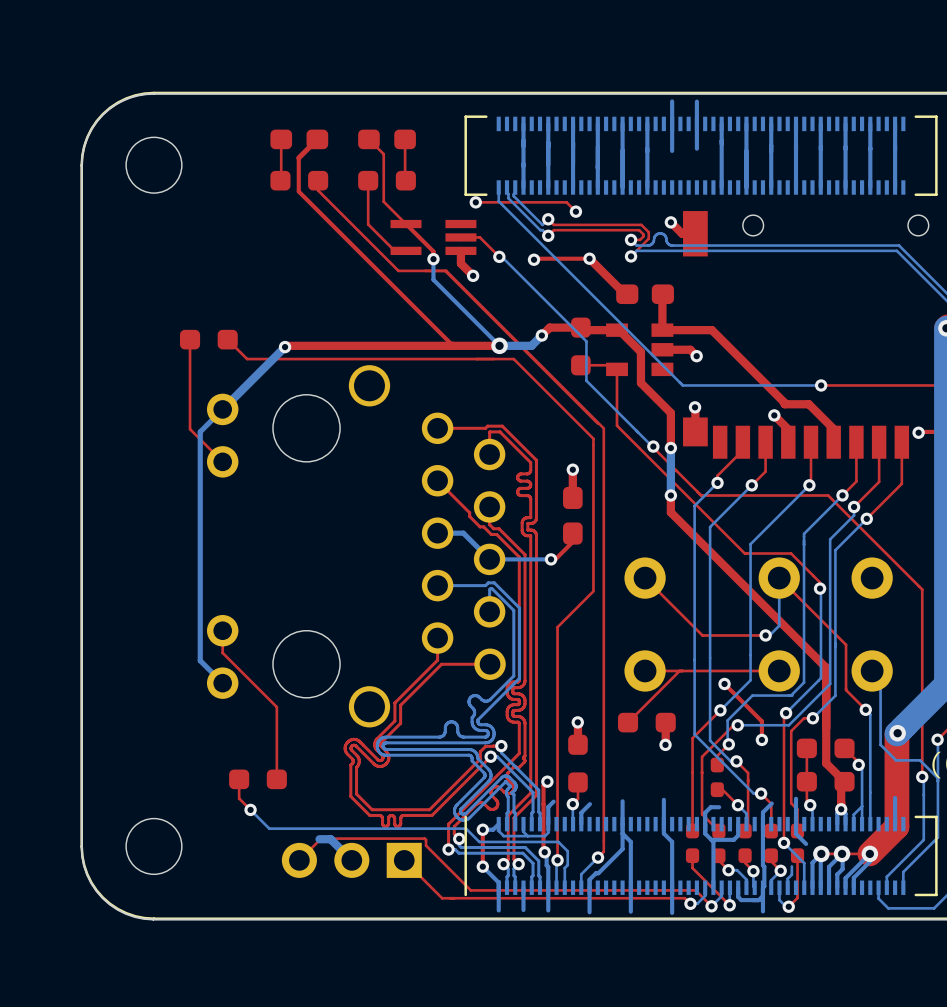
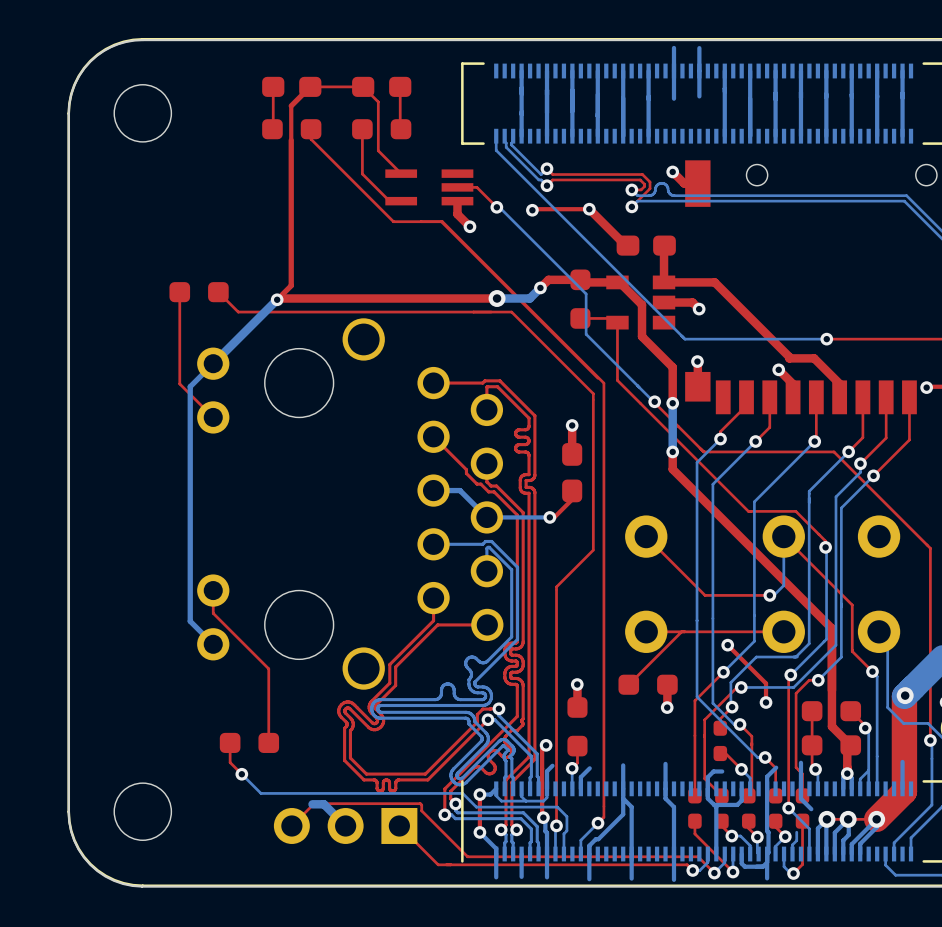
top track: none -> (363, 86) (310, 86)
top track: (298, 191) (453, 345) -> (291, 140) (291, 285) (278, 298)
top track: (475, 202) (566, 202) (575, 211) -> none
via: (475, 202) -> none
via: (575, 211) -> none
top track: (406, 224) (433, 251) (433, 259) -> none
bottom track: (433, 259) (433, 279) (499, 345) -> none
via: (433, 259) -> none

